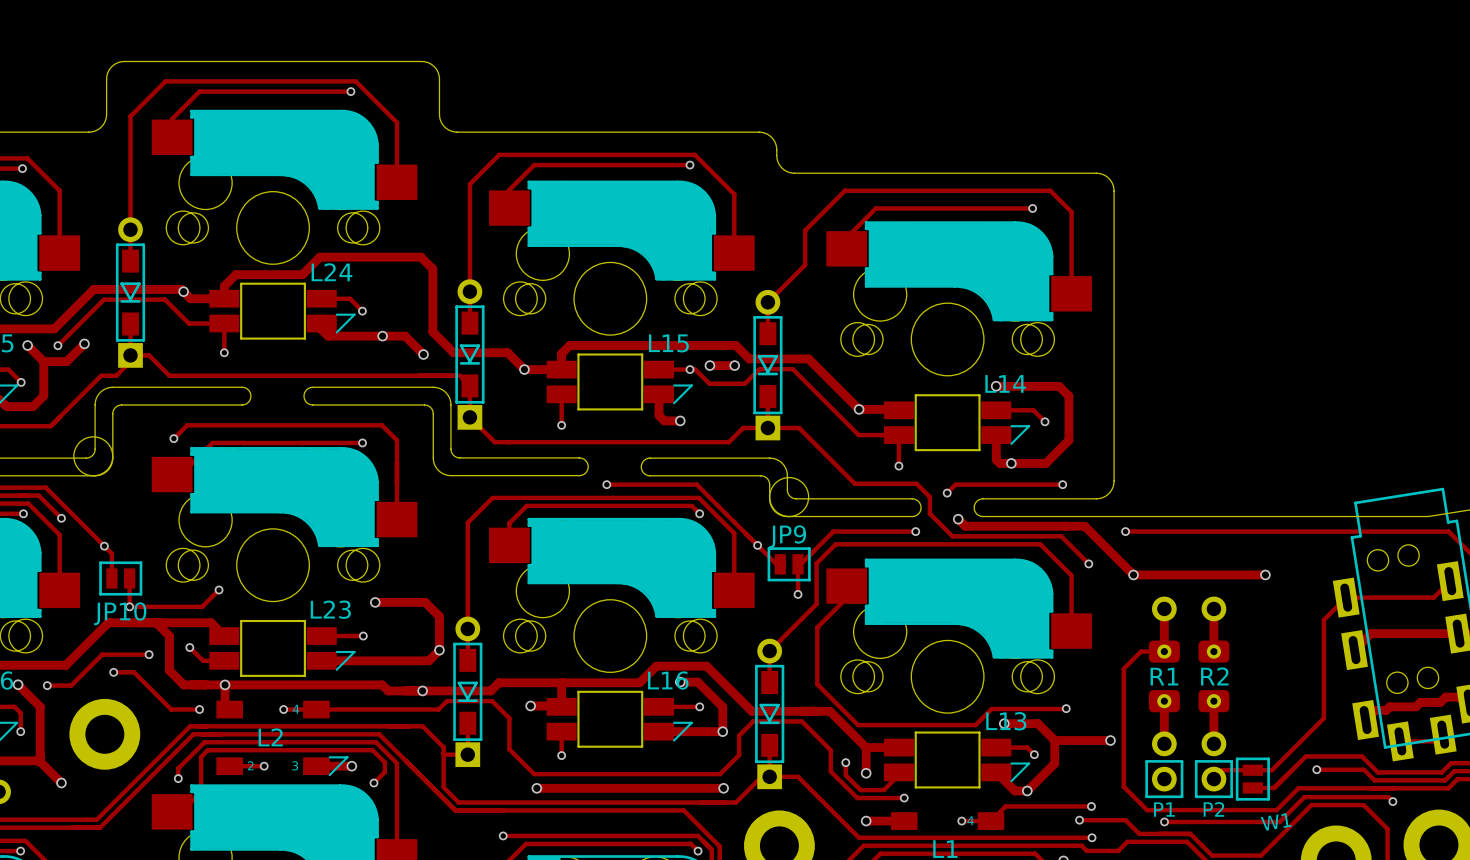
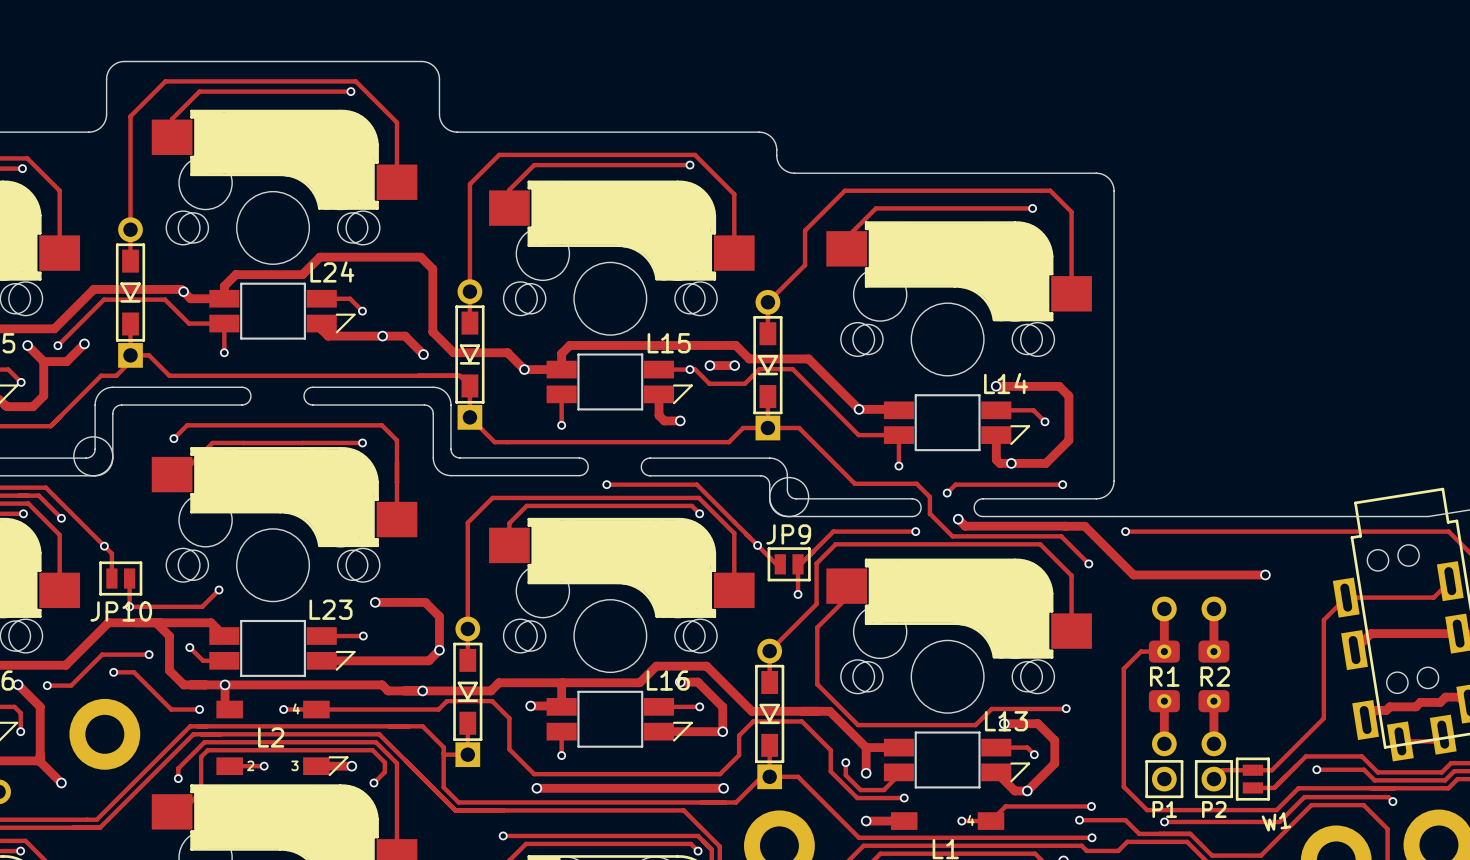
via: (1133, 574) -> none
track: (1054, 740) (1110, 740) -> none
via: (1110, 740) -> none

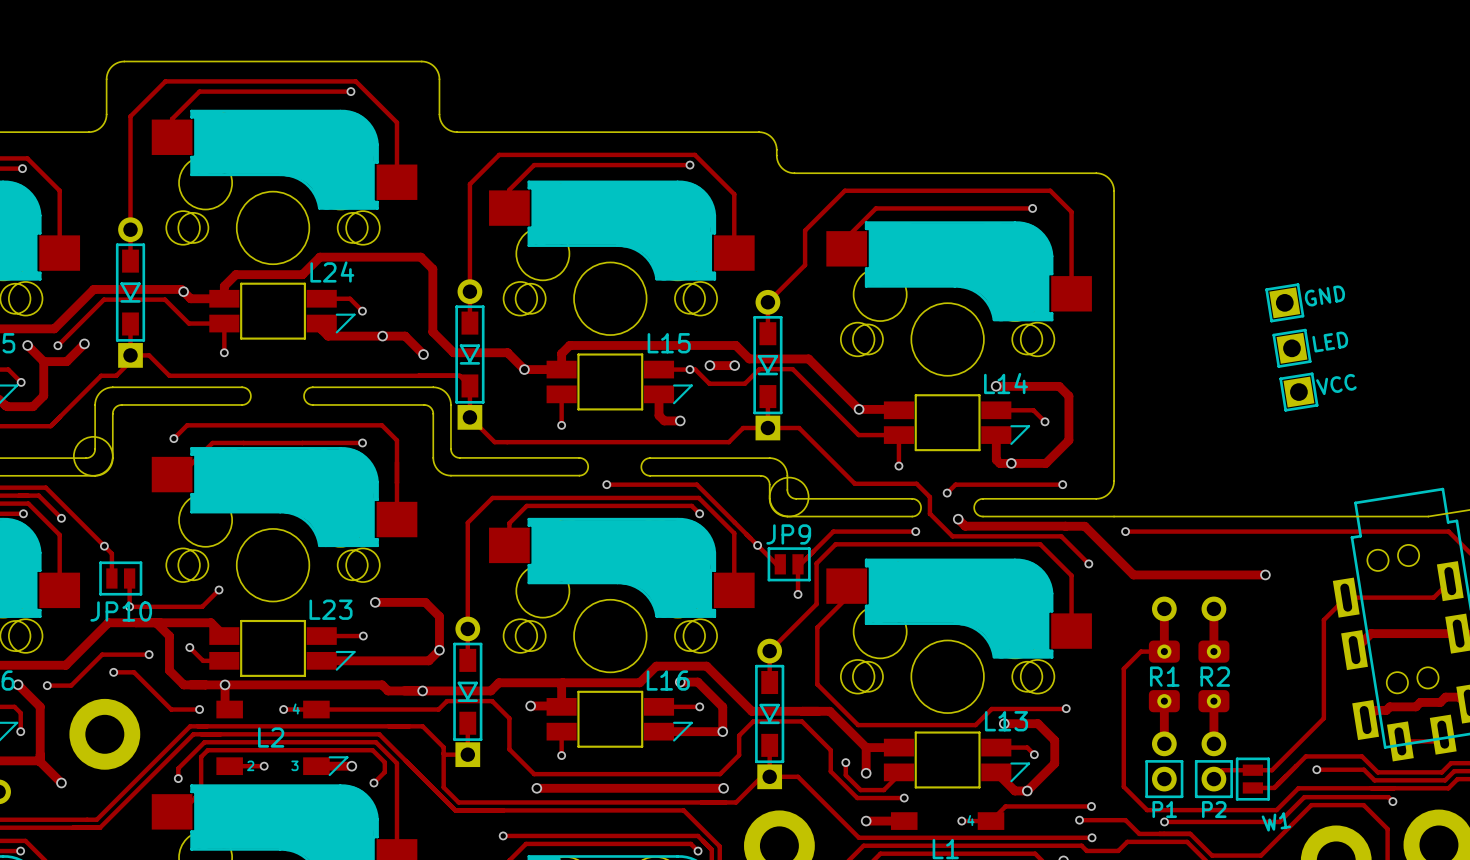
part: none -> (1291, 347)

